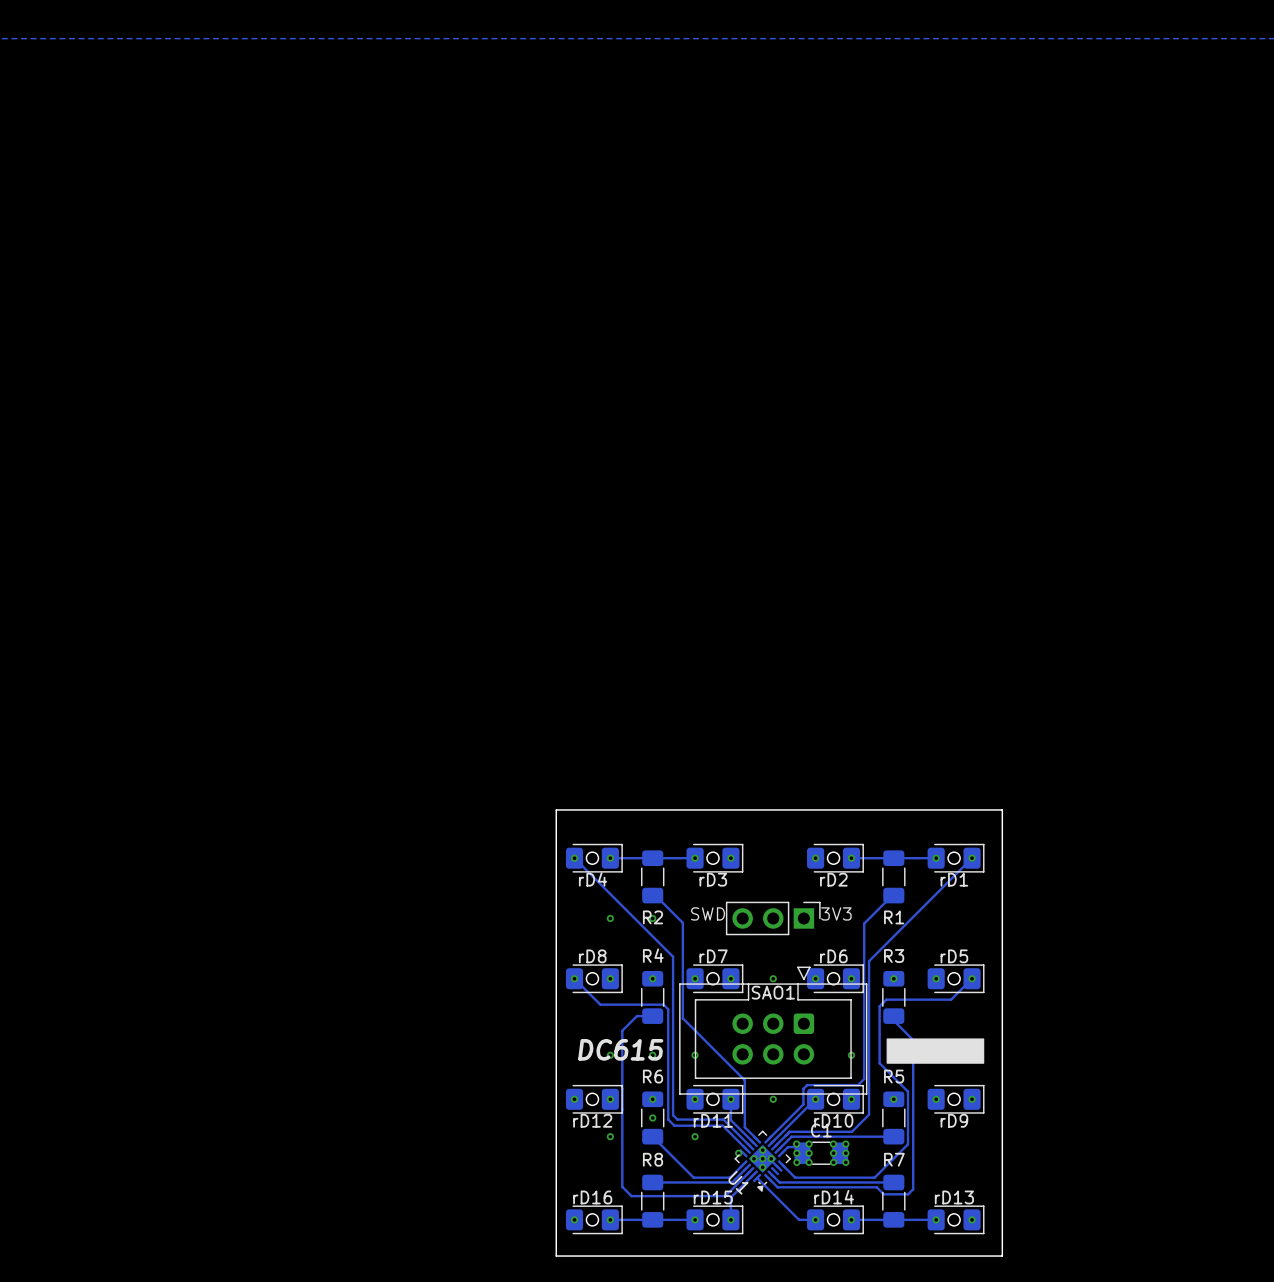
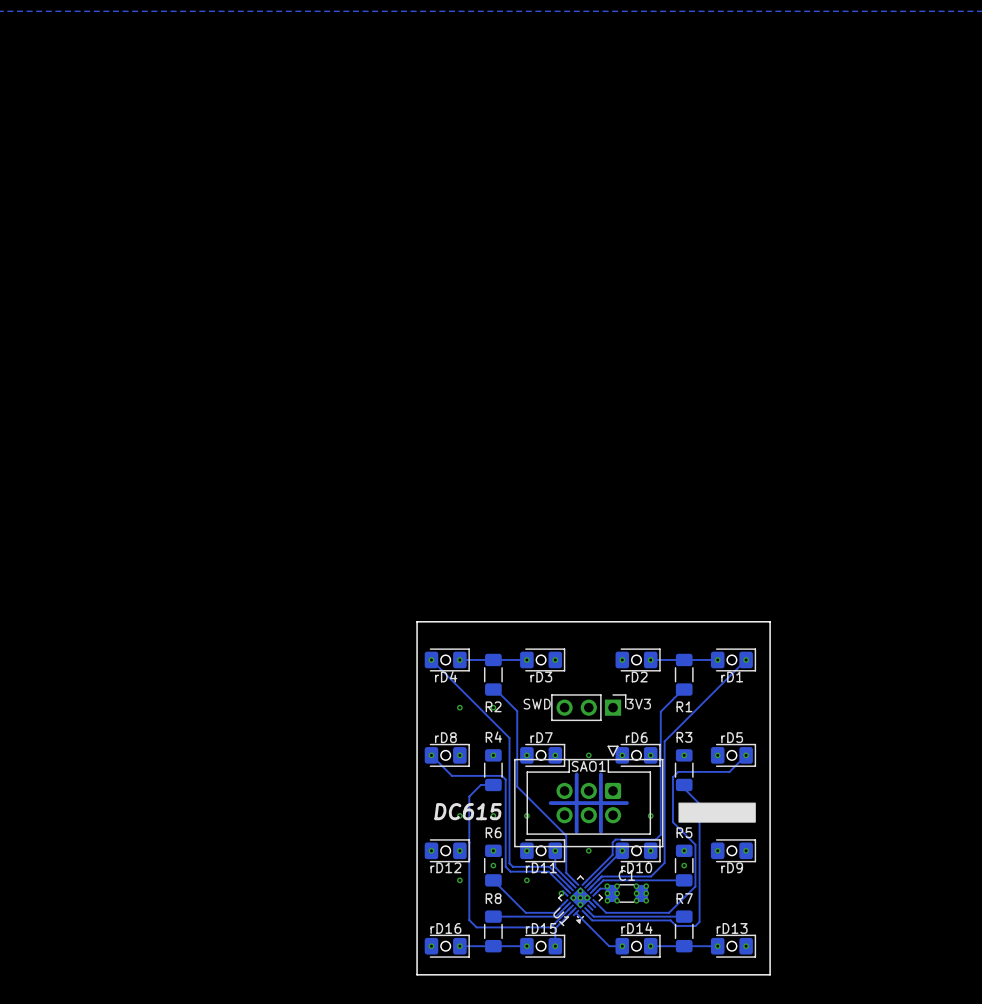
track: none -> (576, 774) (576, 831)
track: none -> (600, 774) (600, 831)
track: none -> (626, 803) (550, 803)
via: none -> (684, 865)

